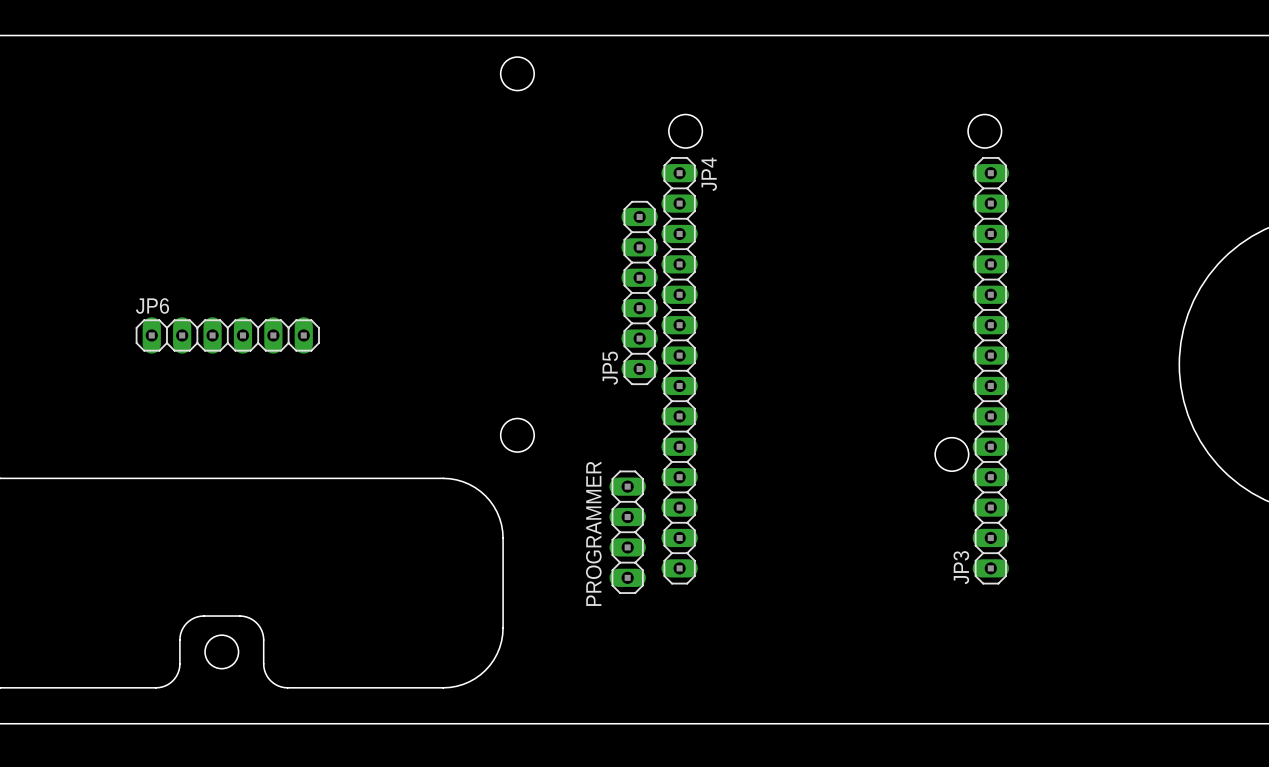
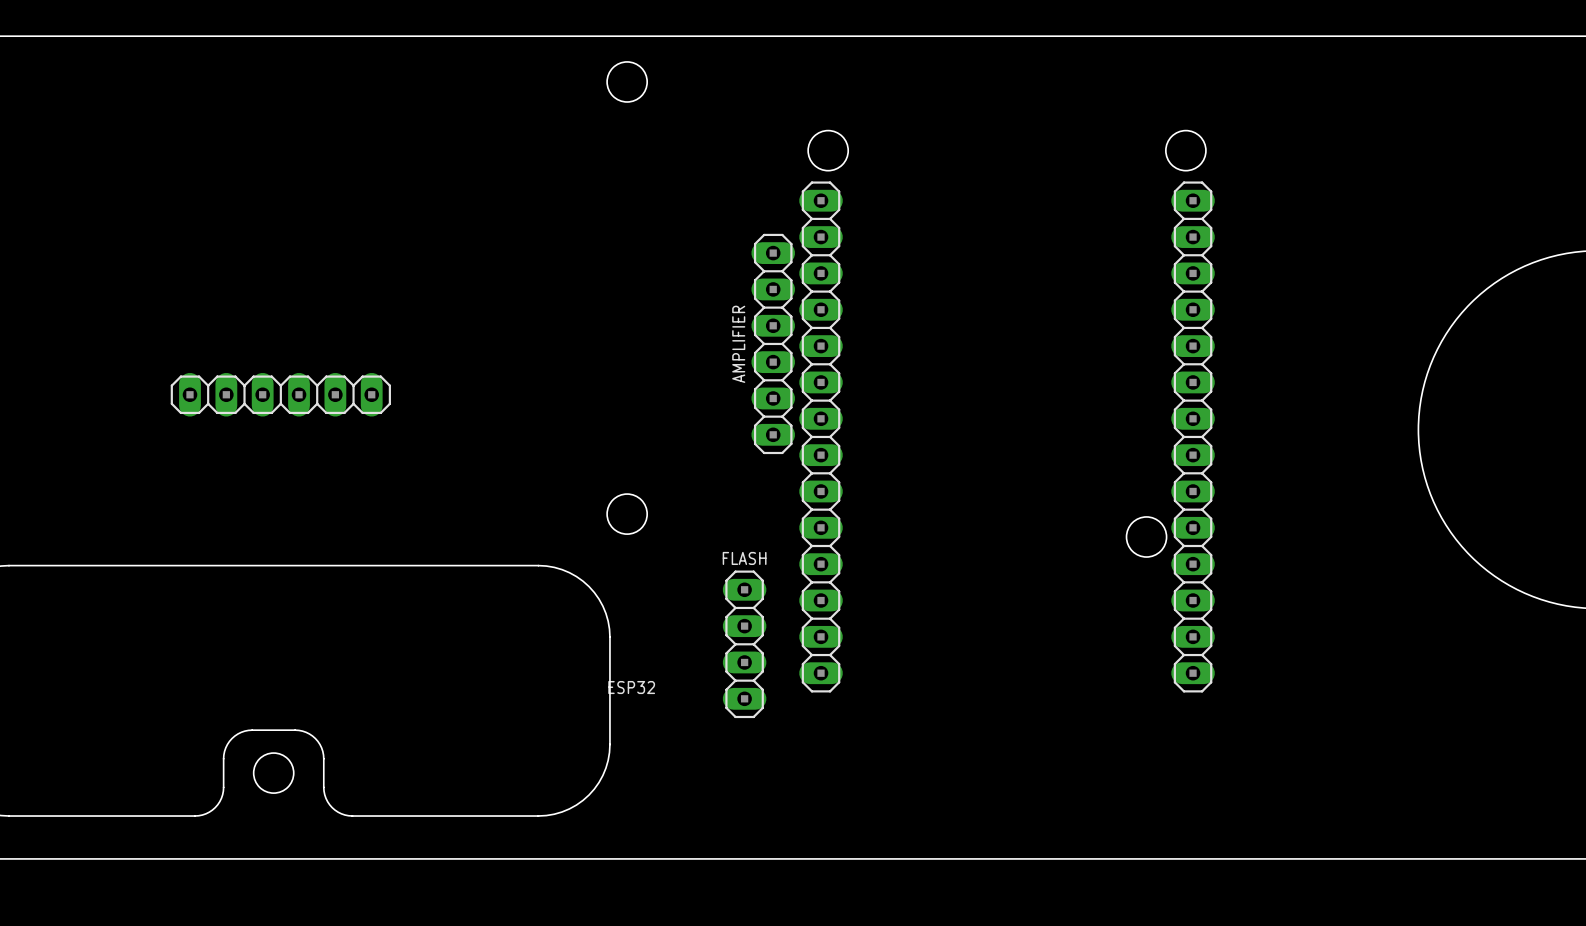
JP4 name: JP4 (709, 174) -> ESP32 (631, 687)
JP6 name: JP6 (152, 305) -> none
JP5 name: JP5 (610, 368) -> AMPLIFIER (738, 344)
PROGRAMMER: (627, 532) -> none
FLASH: none -> (744, 644)
JP3 name: JP3 (961, 567) -> none

